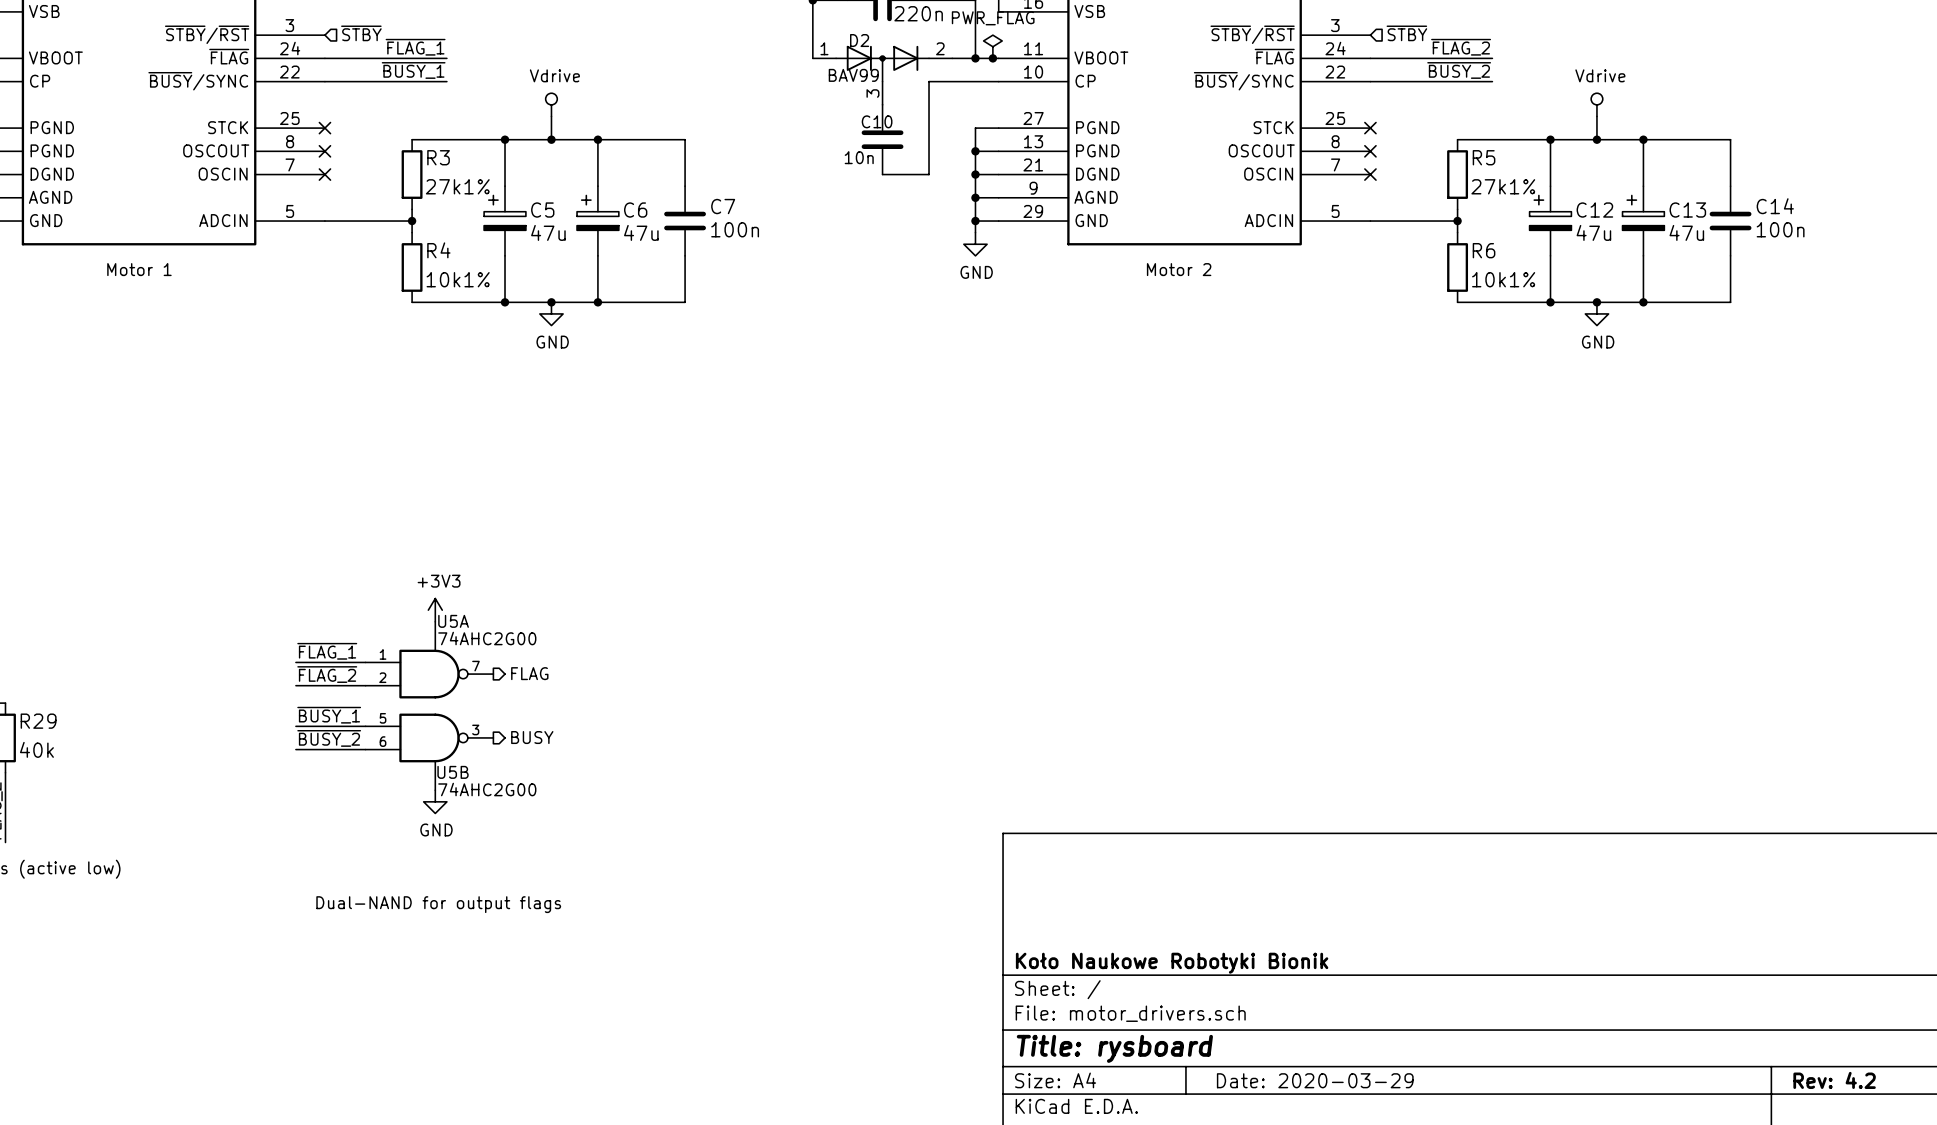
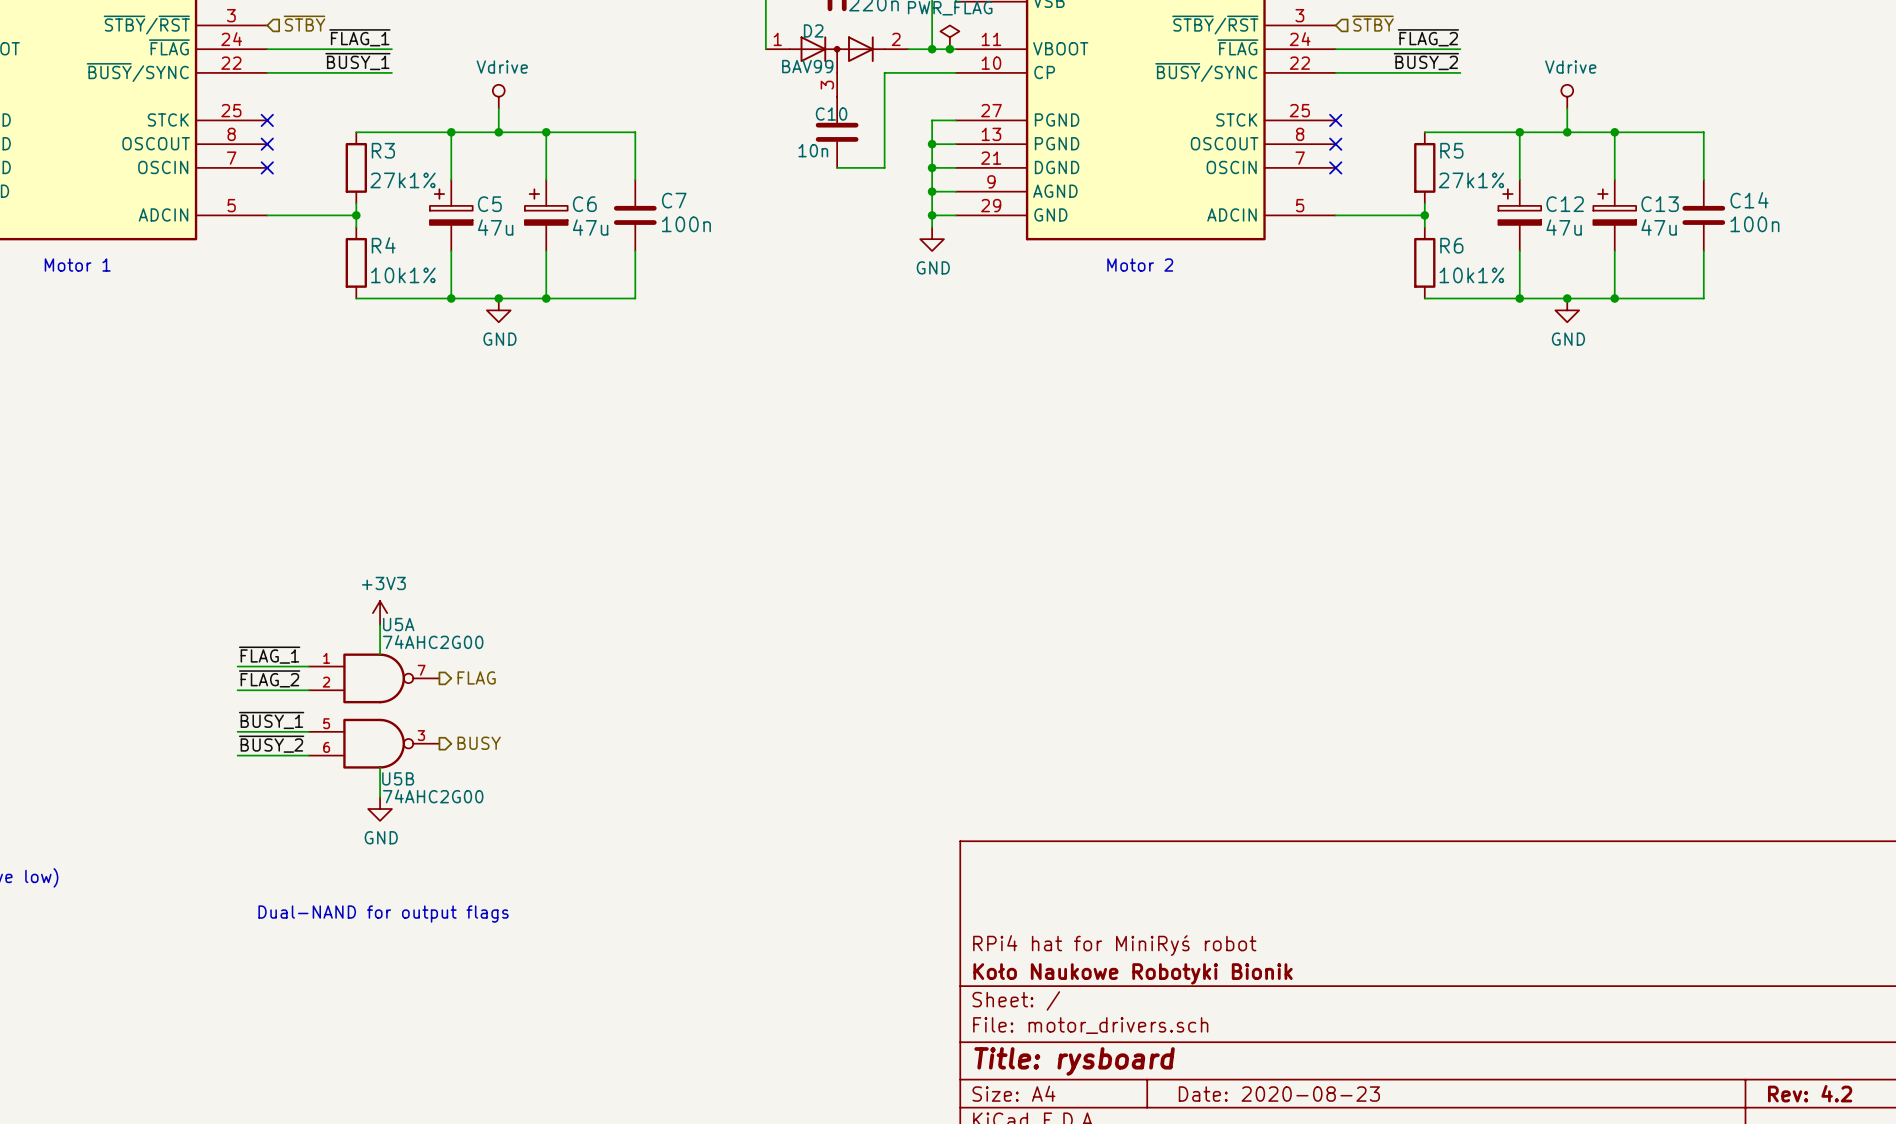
title block: none -> RPi4 hat for MiniRyś robot (1114, 945)
title block: Date: 2020-03-29 (1315, 1080) -> Date: 2020-08-23 (1279, 1094)

